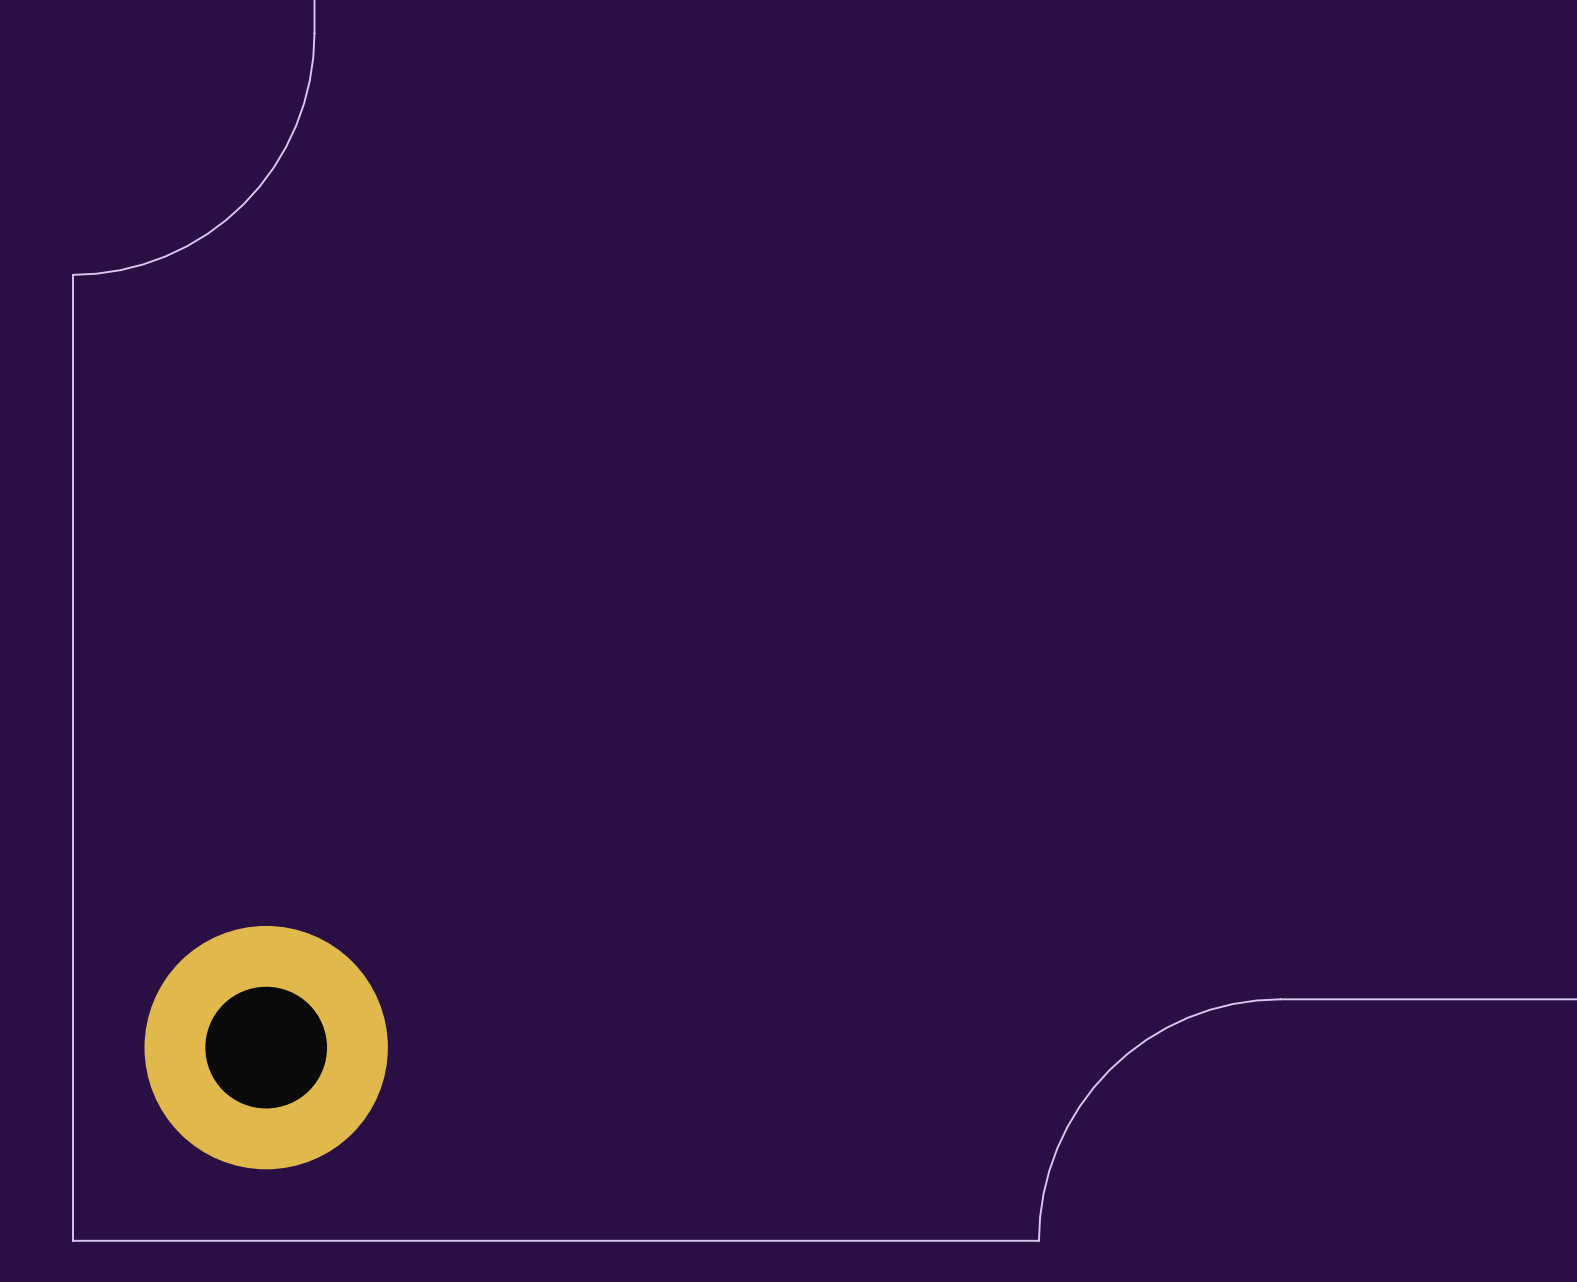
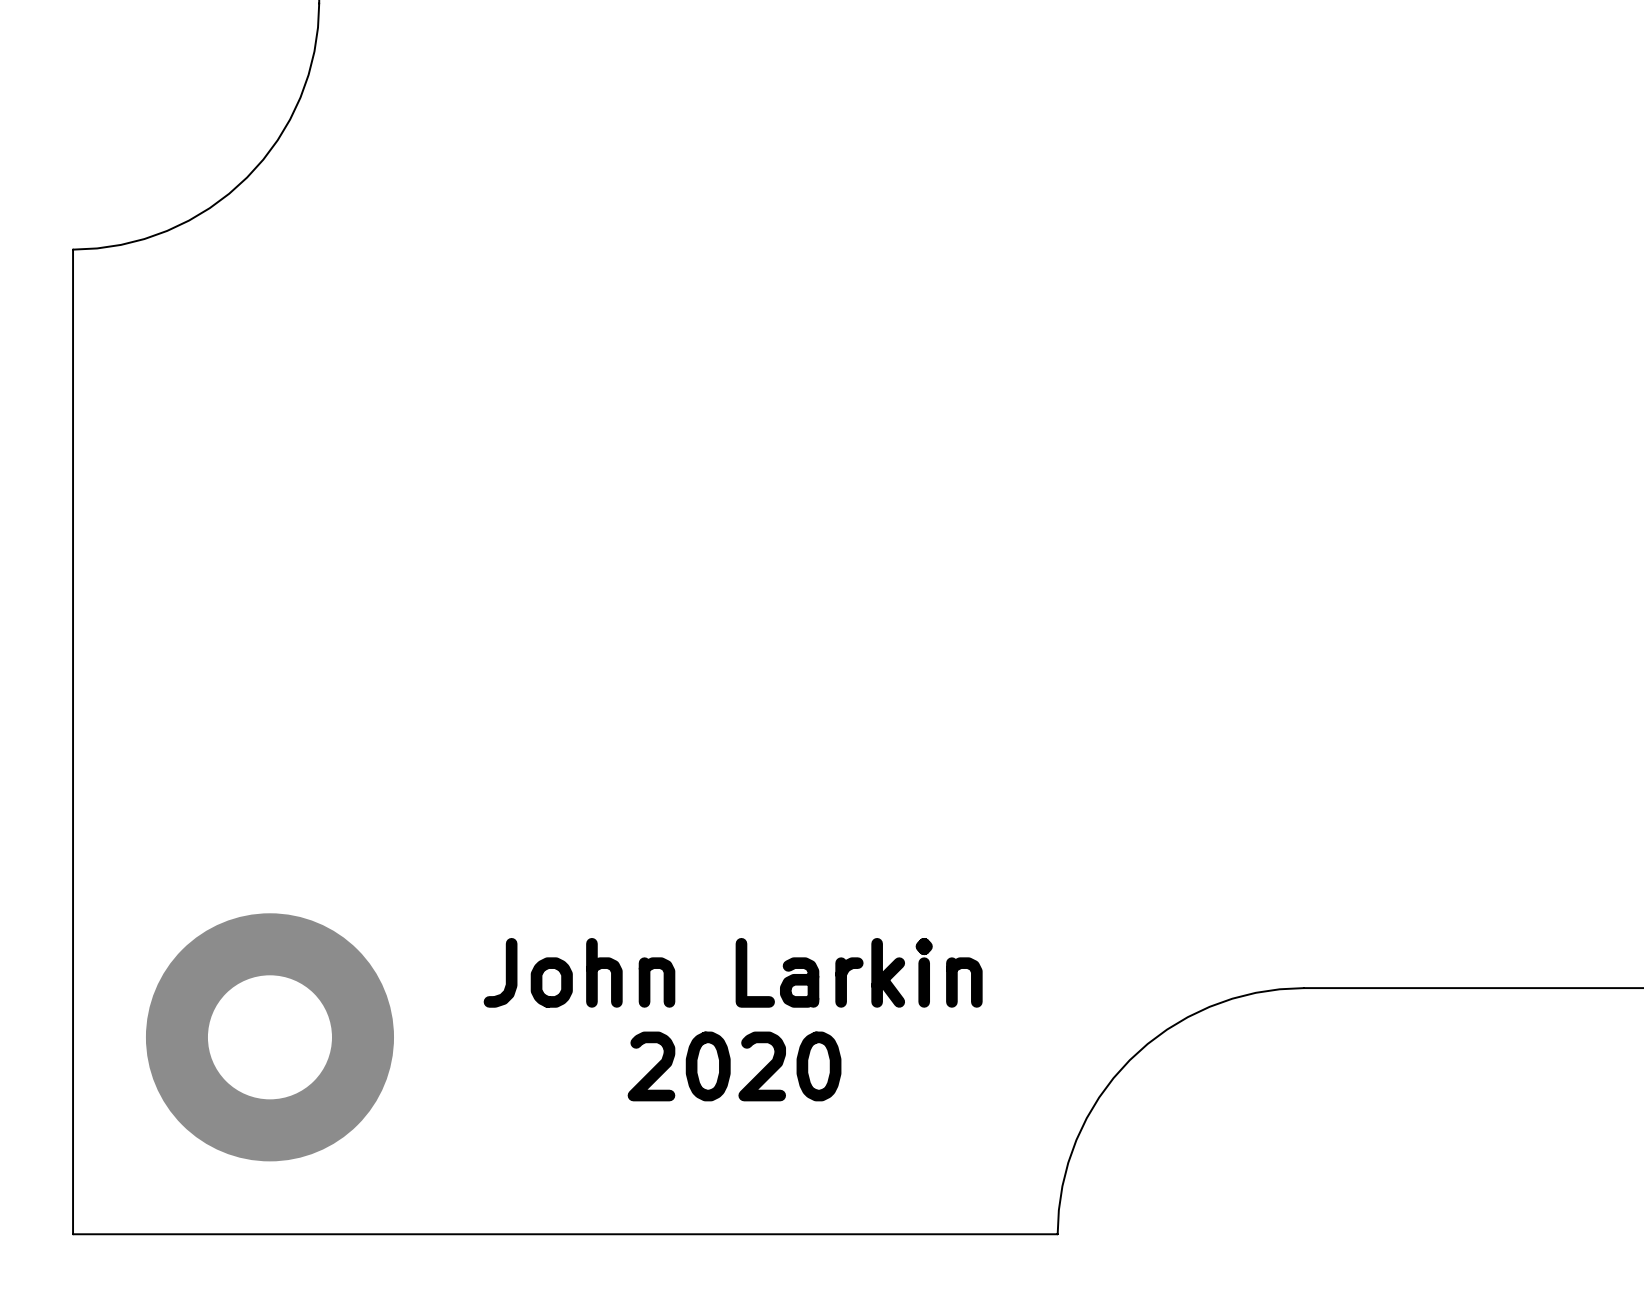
text: none -> John Larkin (733, 972)
text: none -> 2020 (734, 1066)

